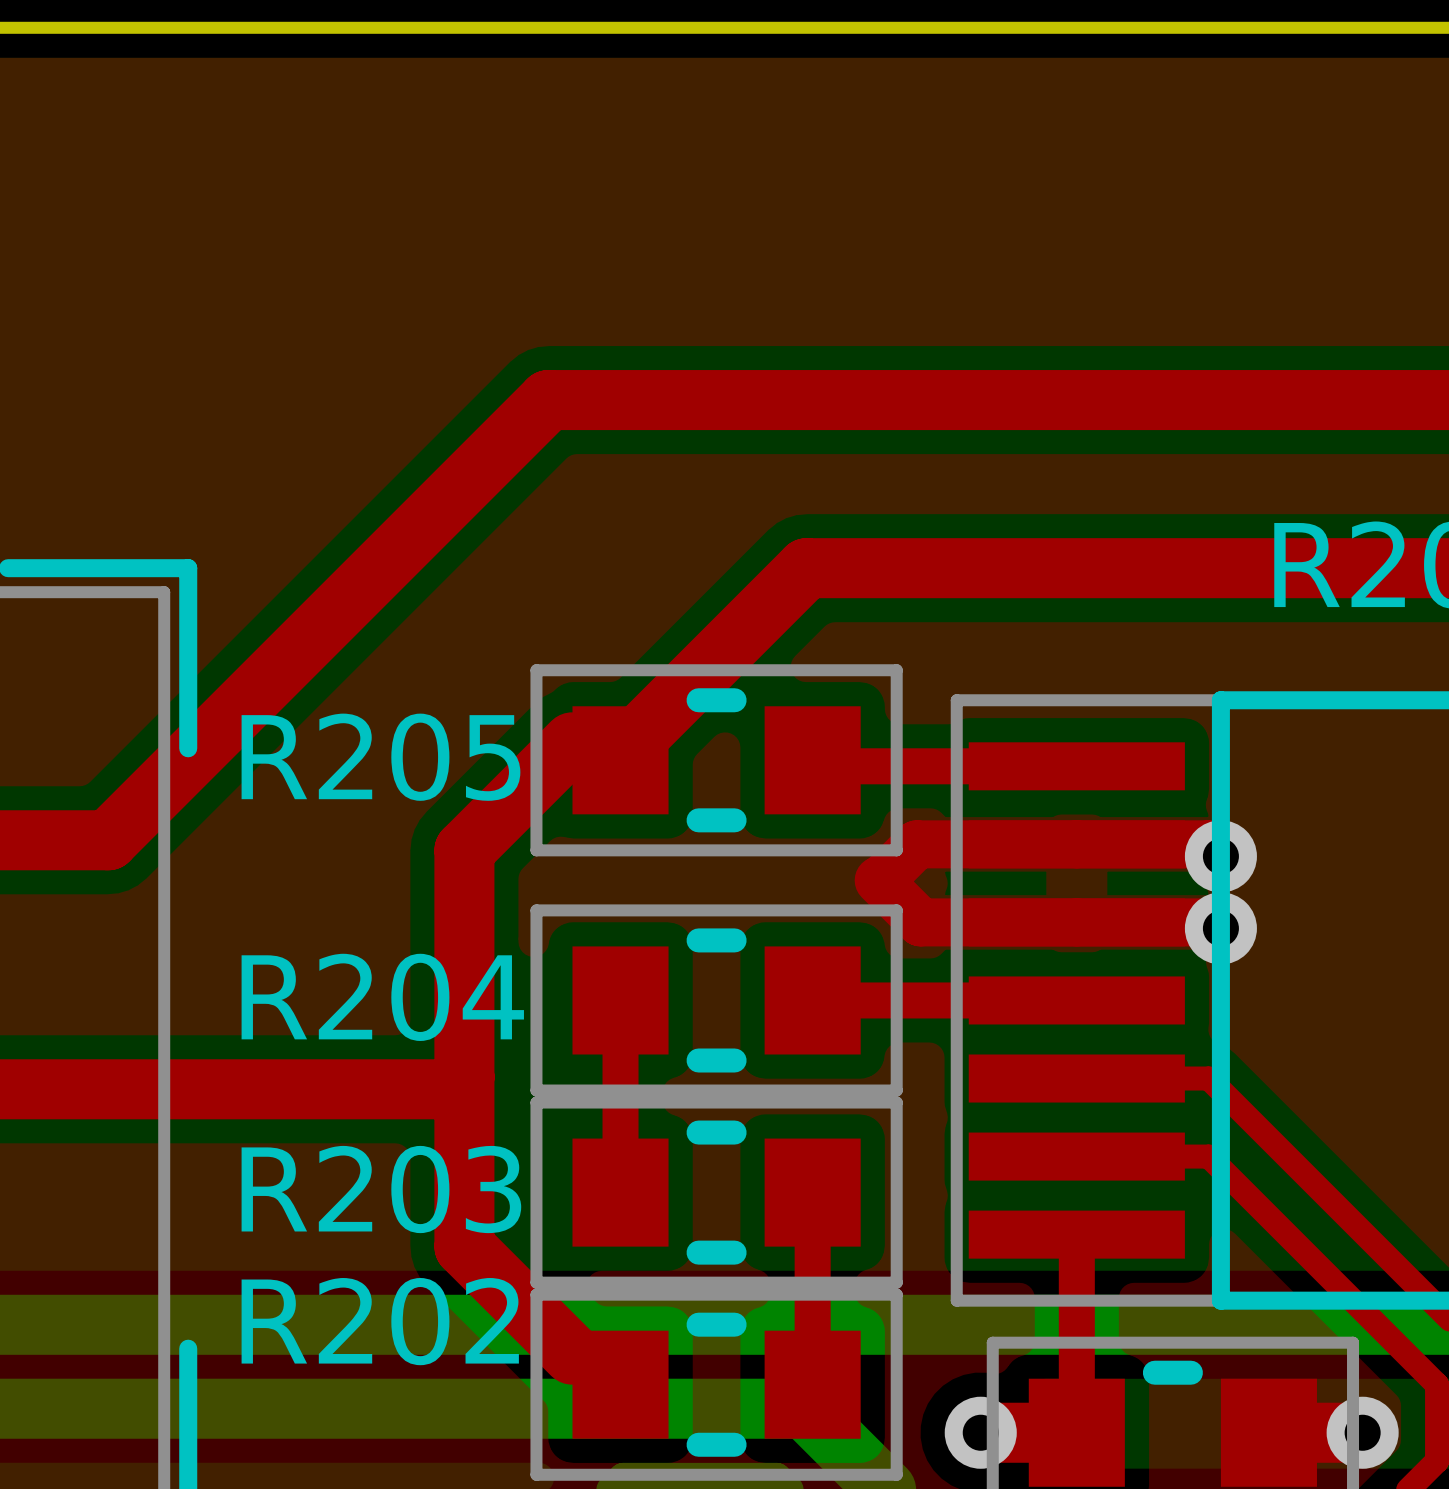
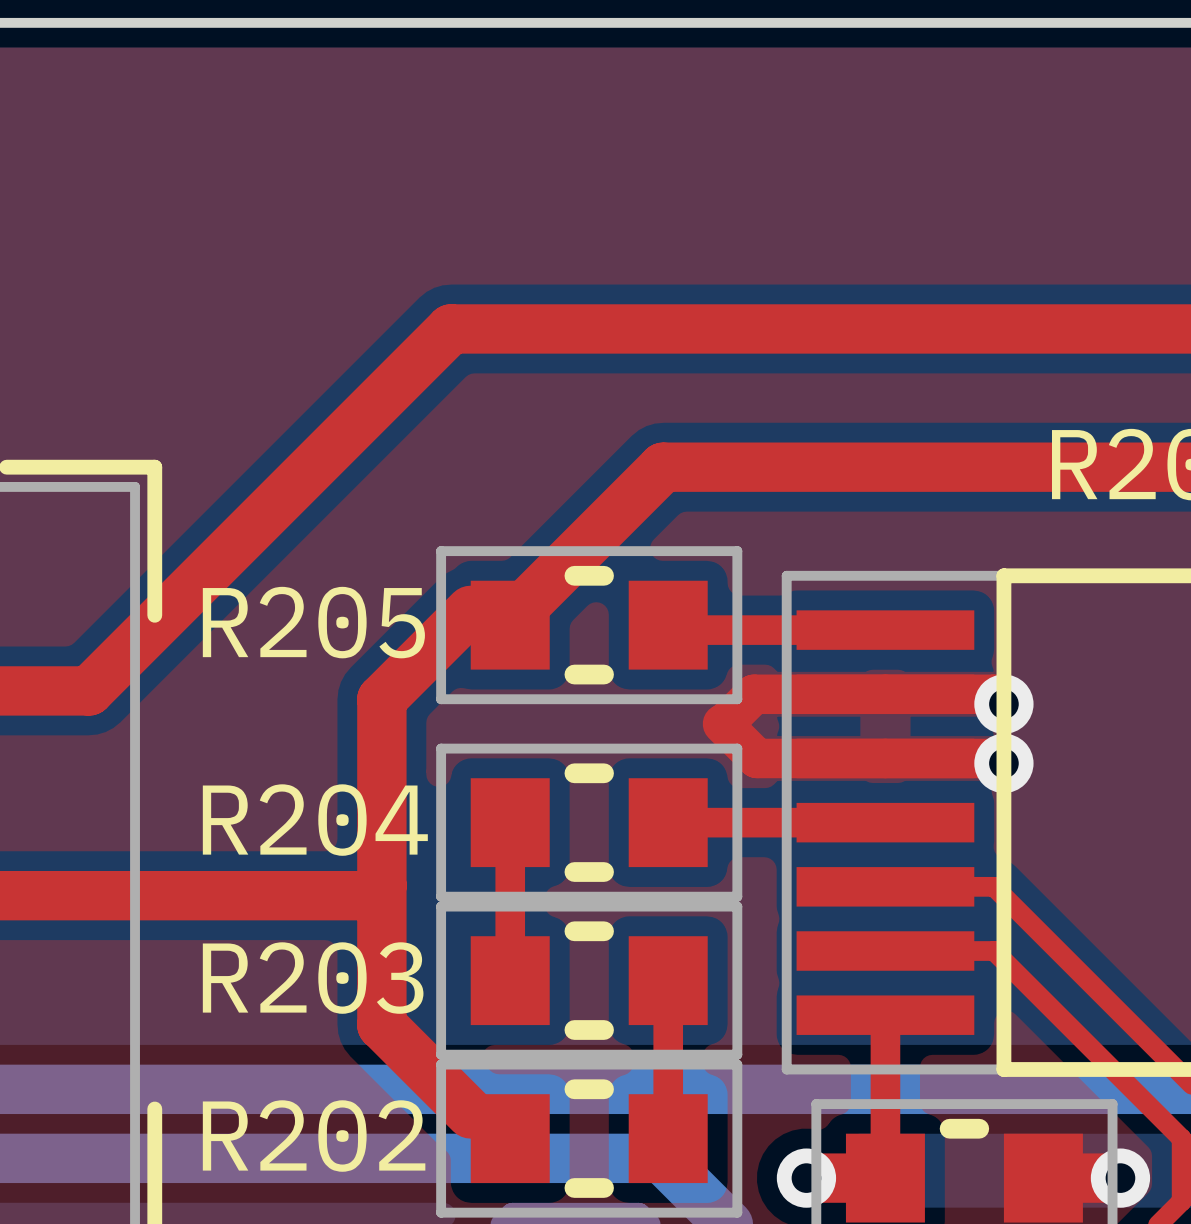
R202 name position: R202 (380, 1321) -> R202 (314, 1136)

